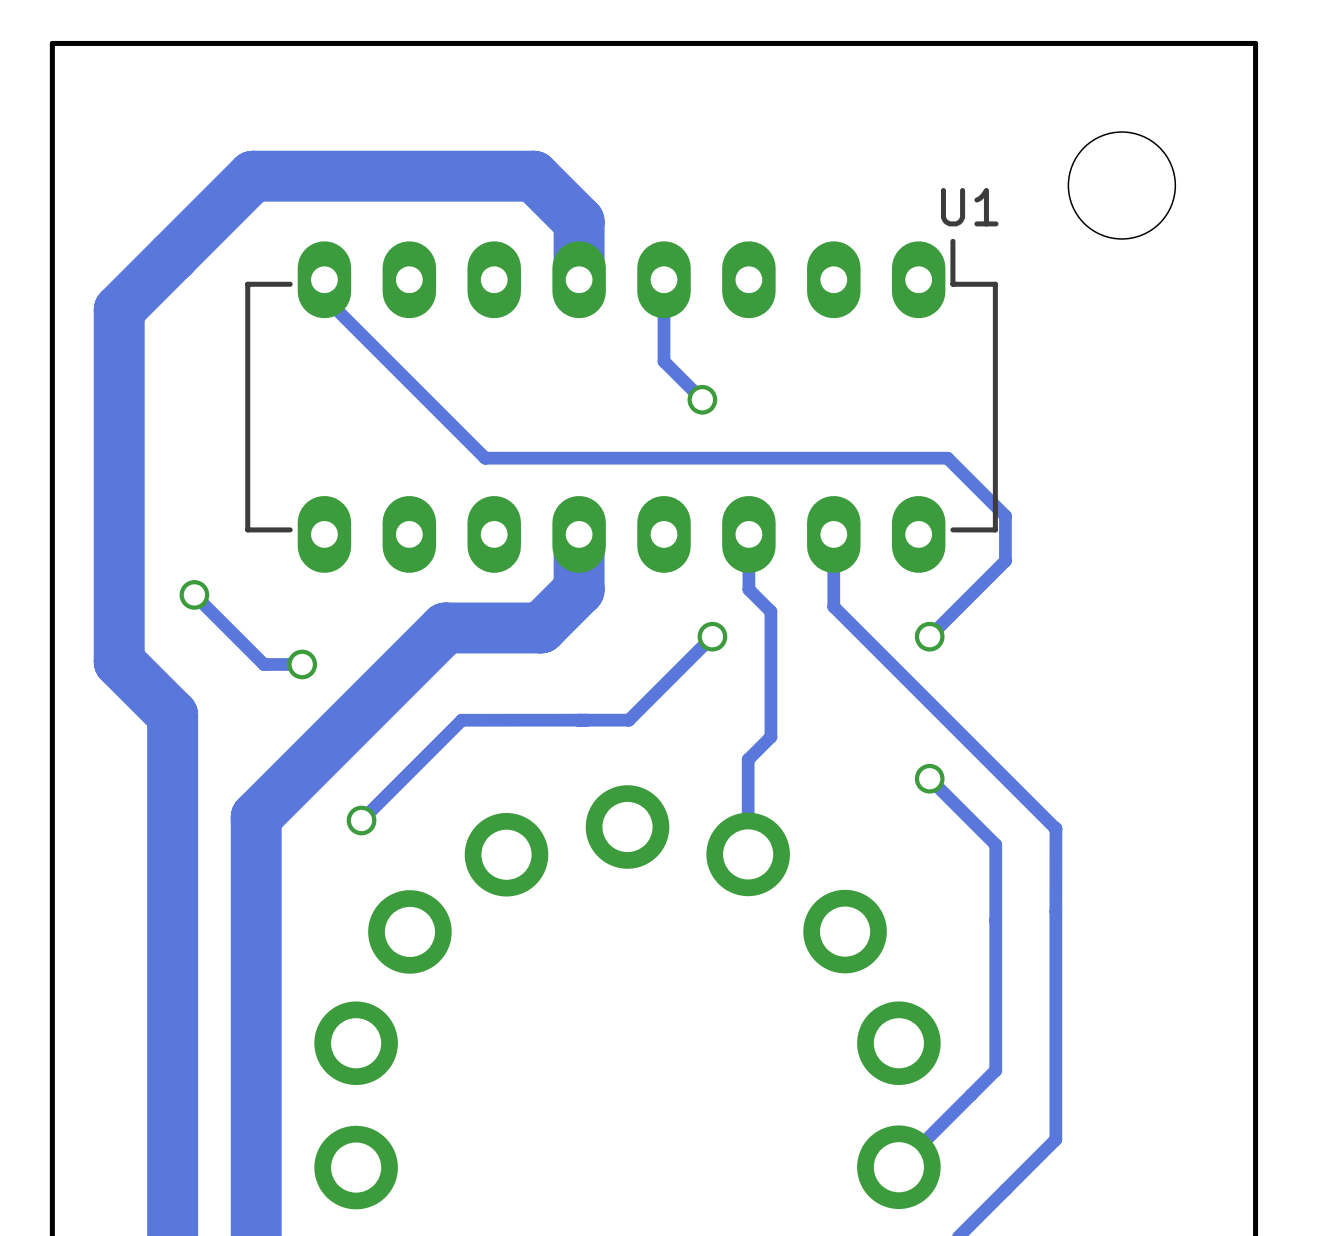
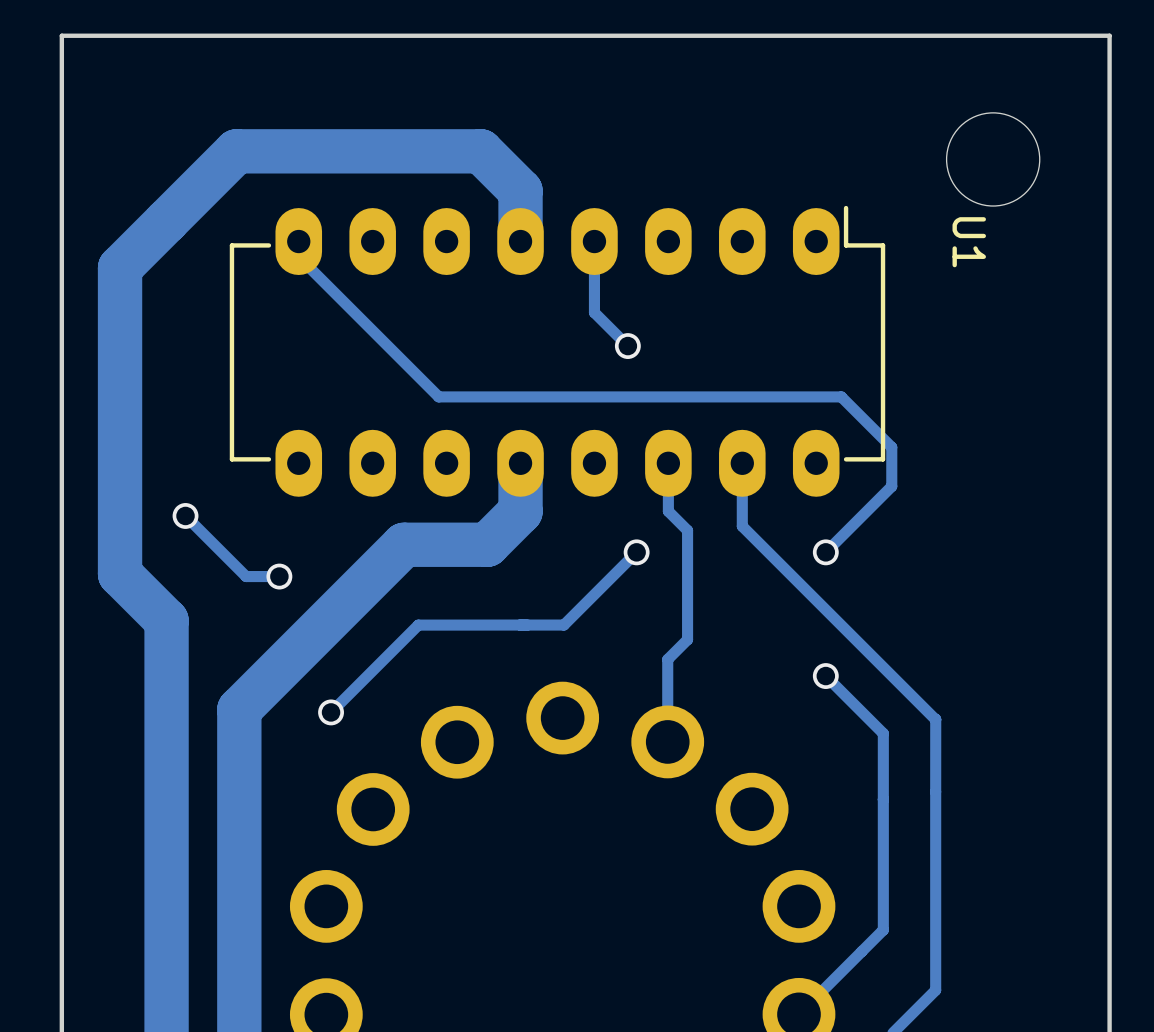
U1 name rotation: 0° (969, 207) -> 90° clockwise (969, 242)
U1 name position: U1 (969, 207) -> U1 (969, 242)

